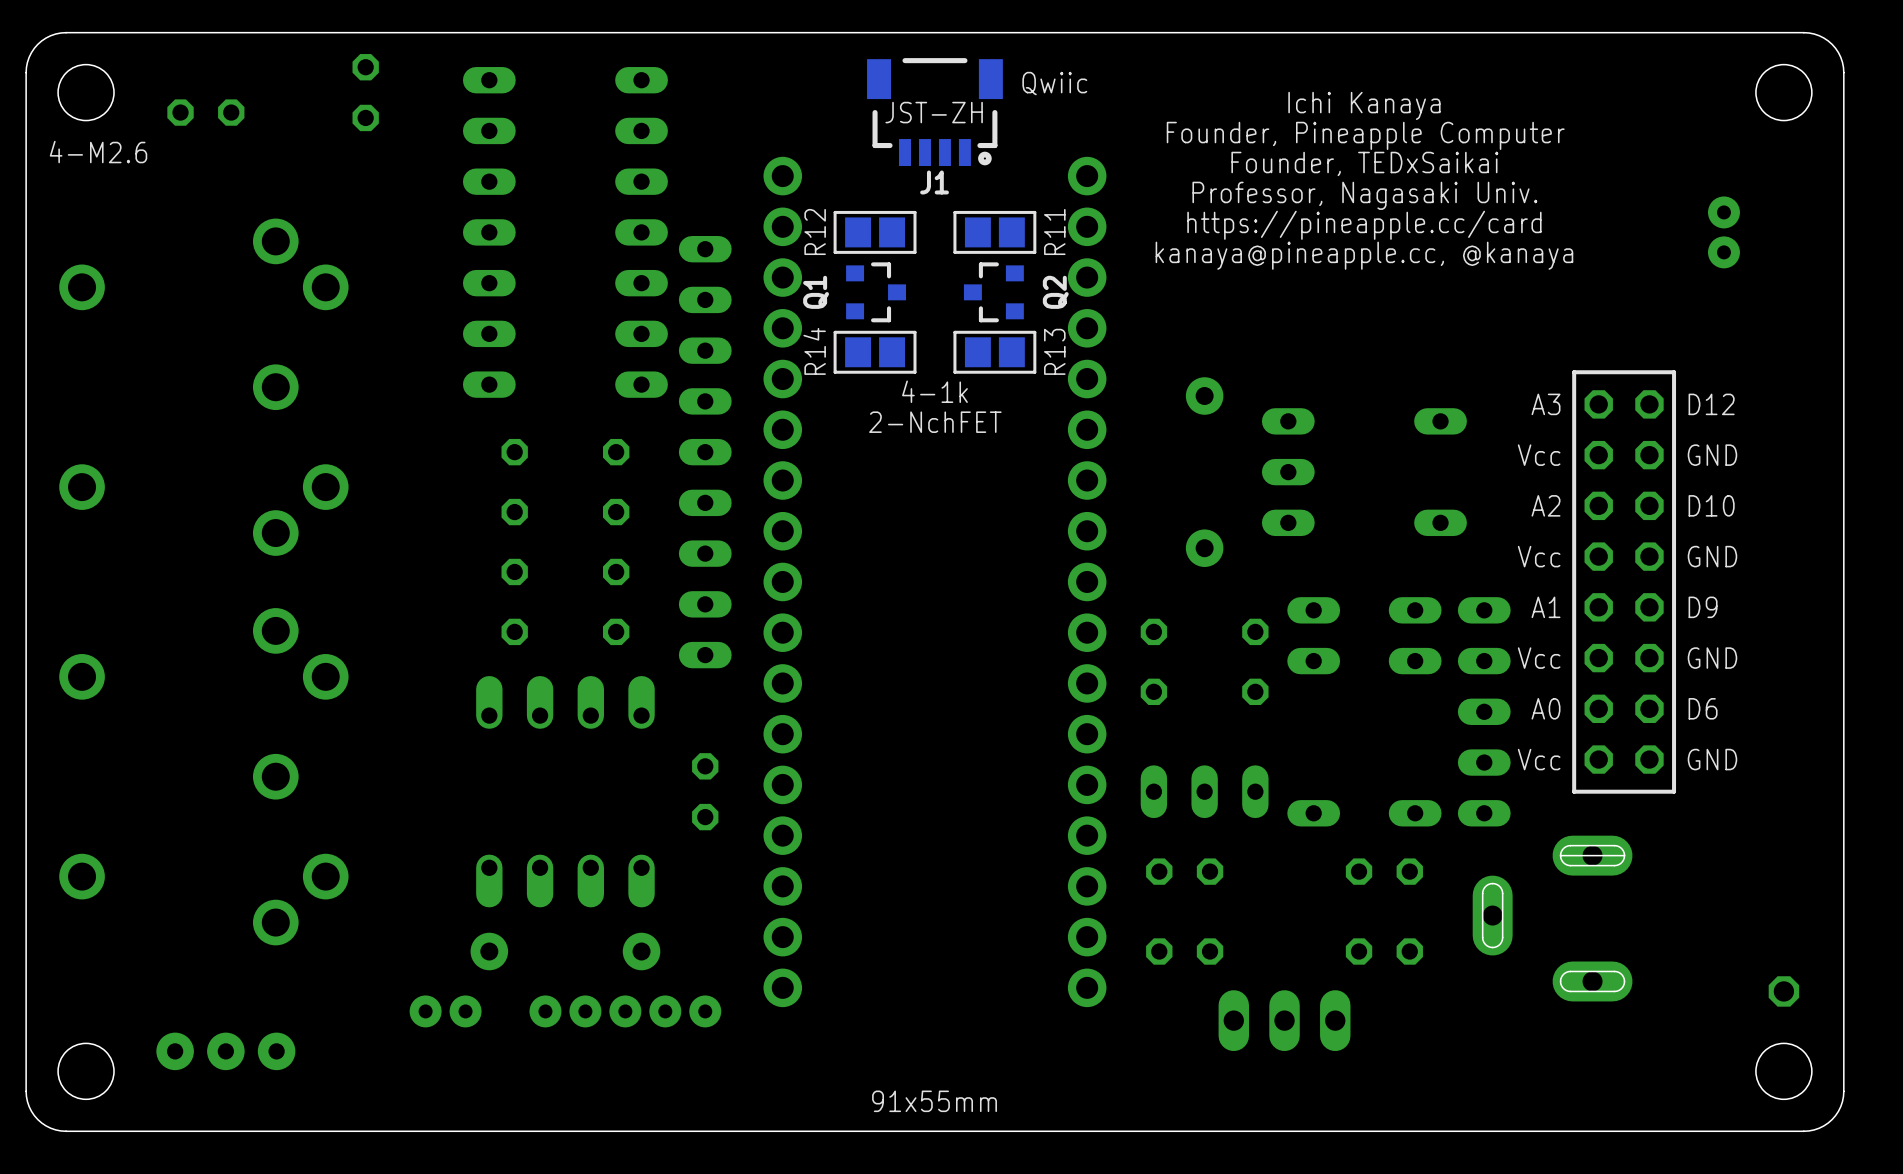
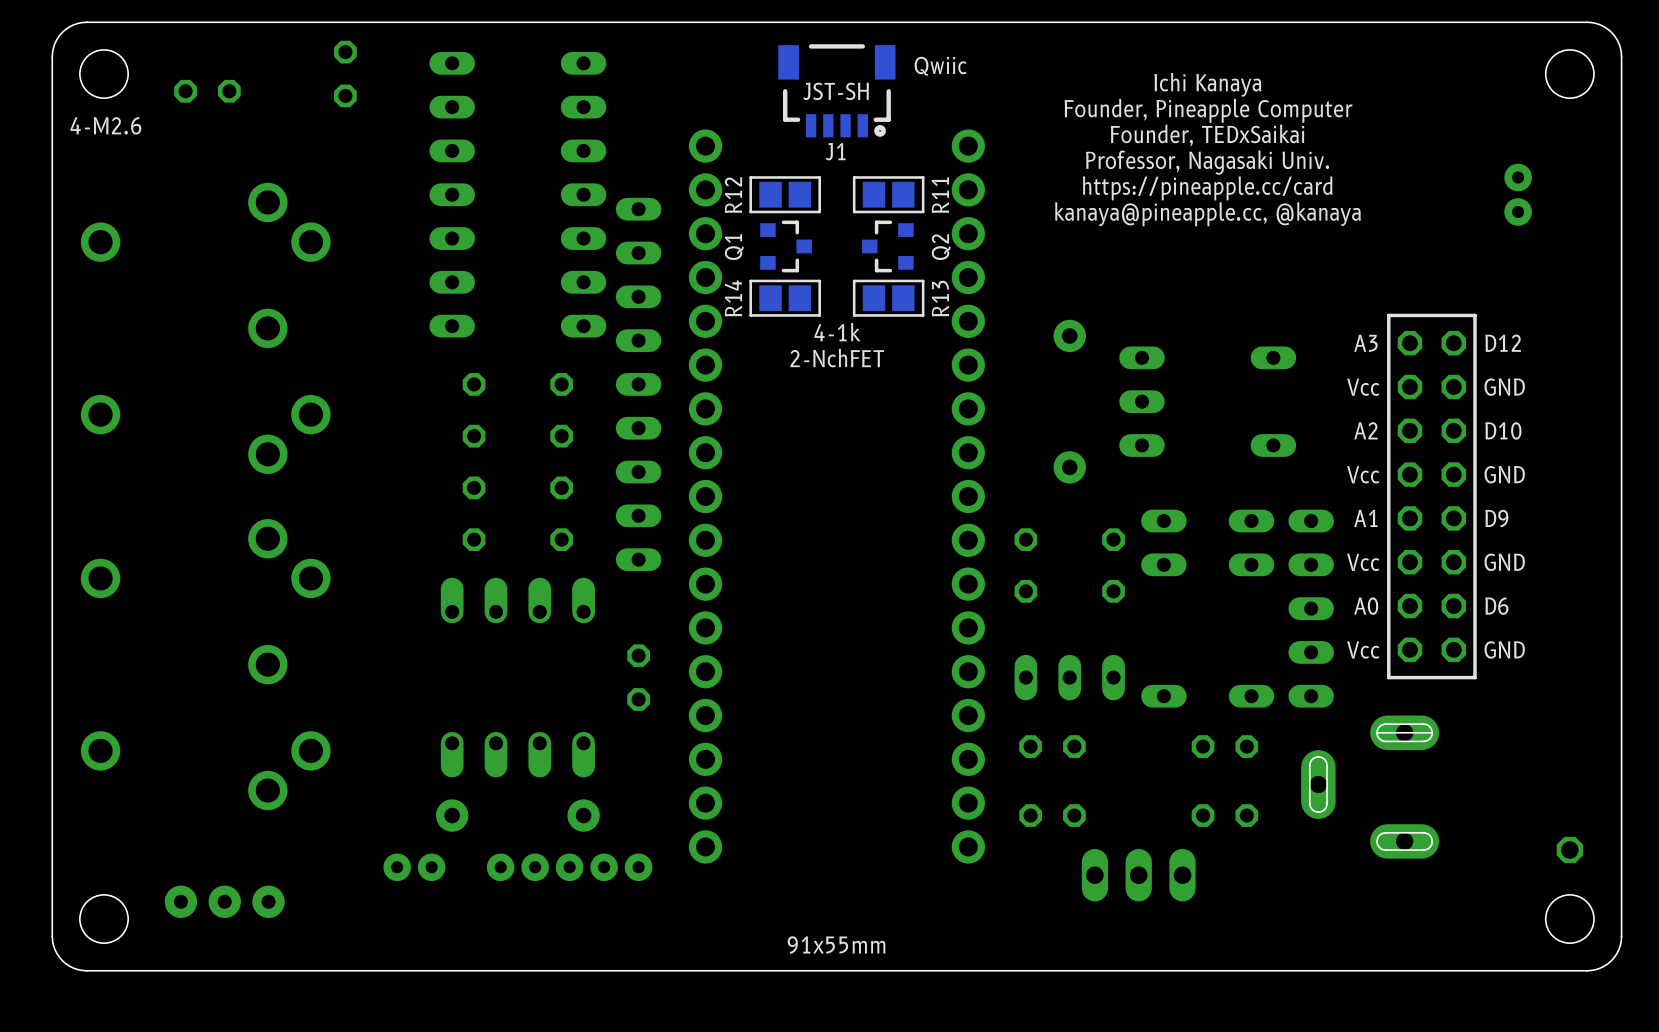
text: JST-ZH (934, 112) -> JST-SH (836, 91)

